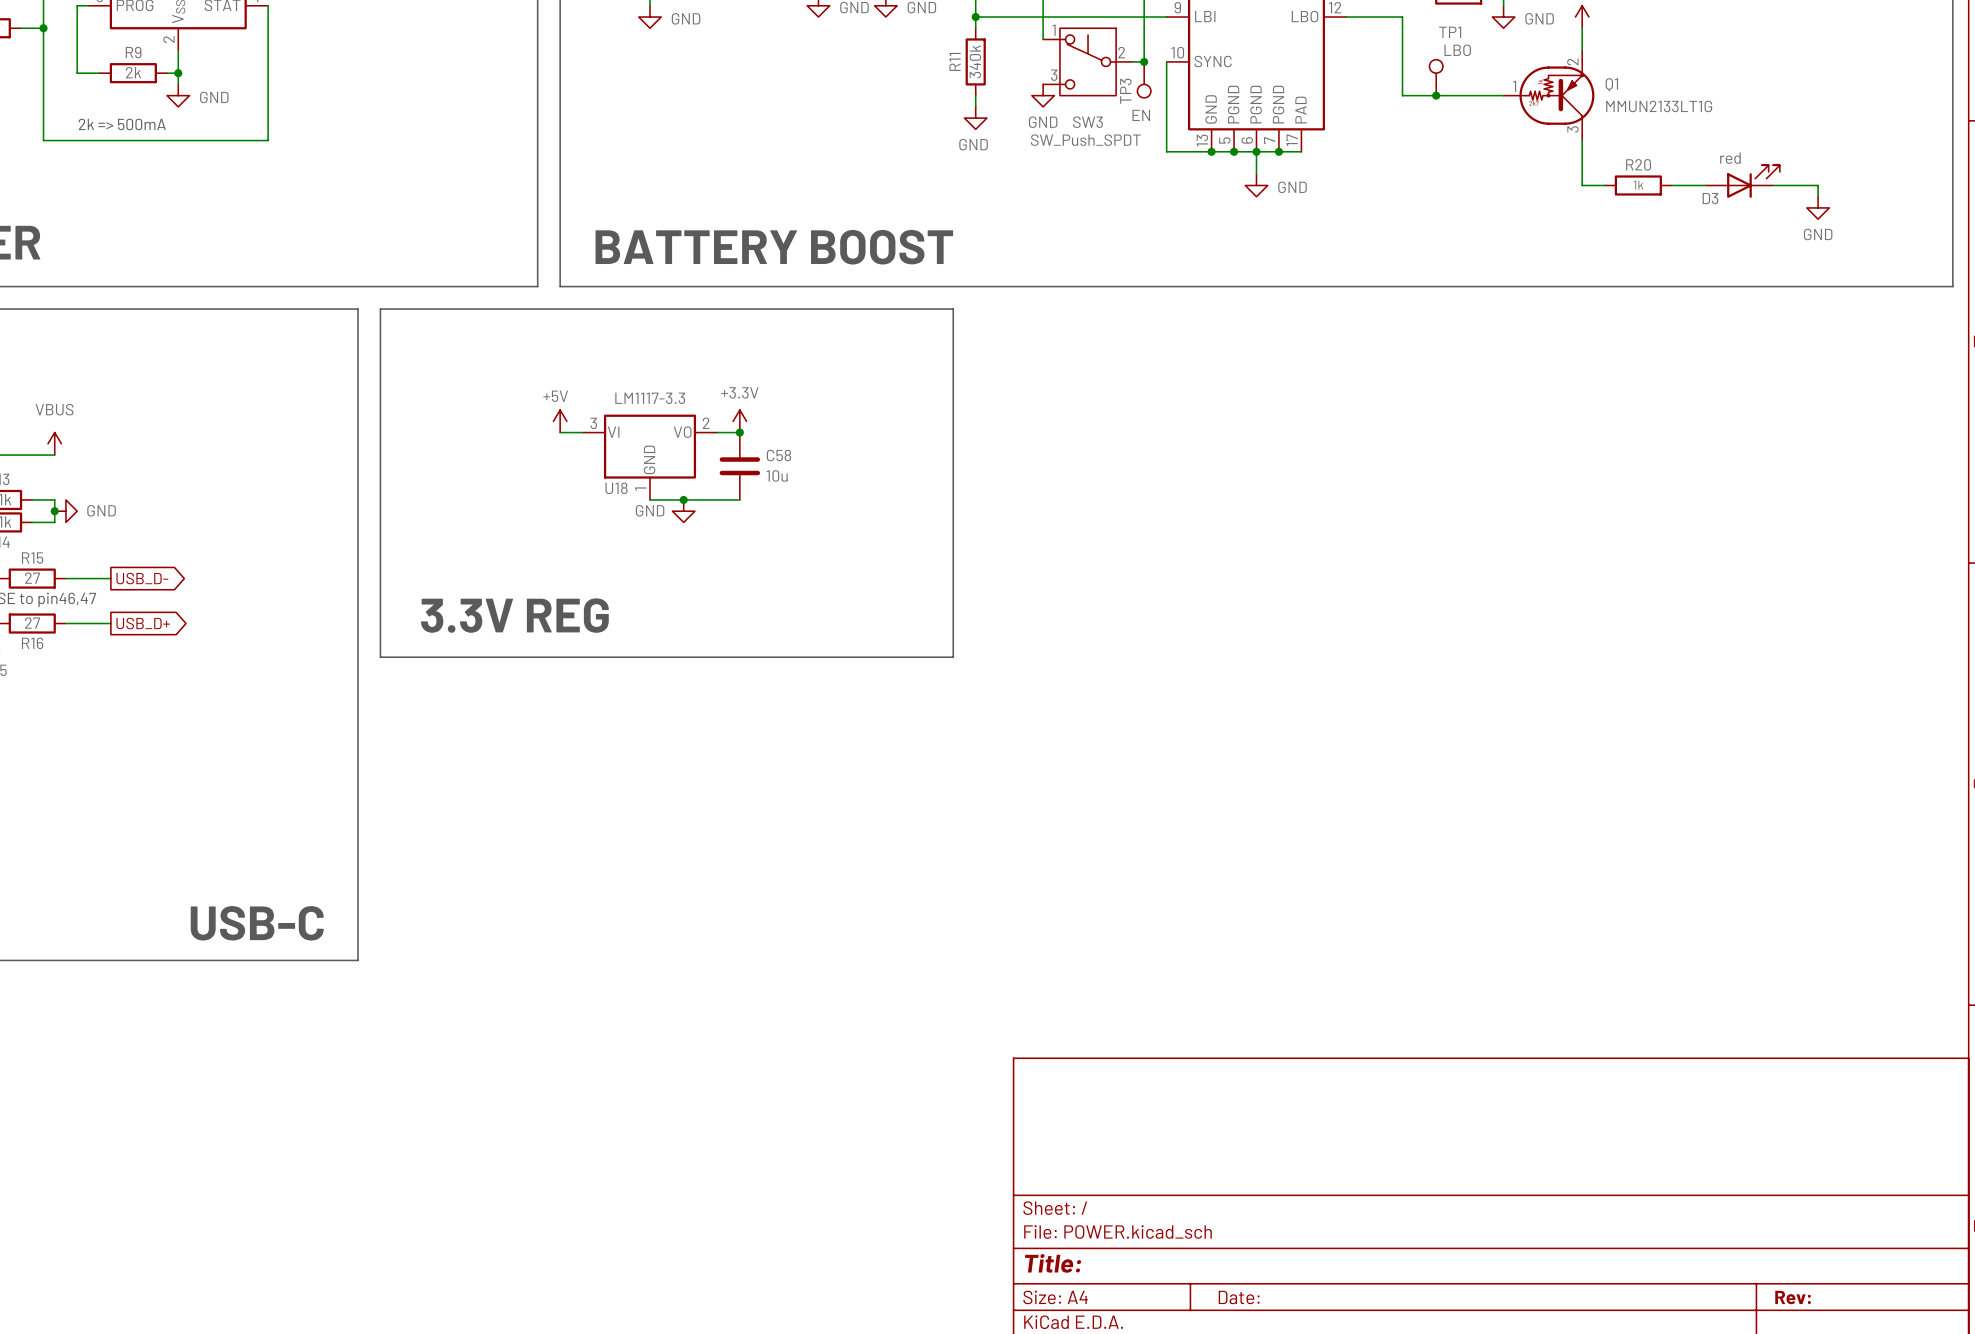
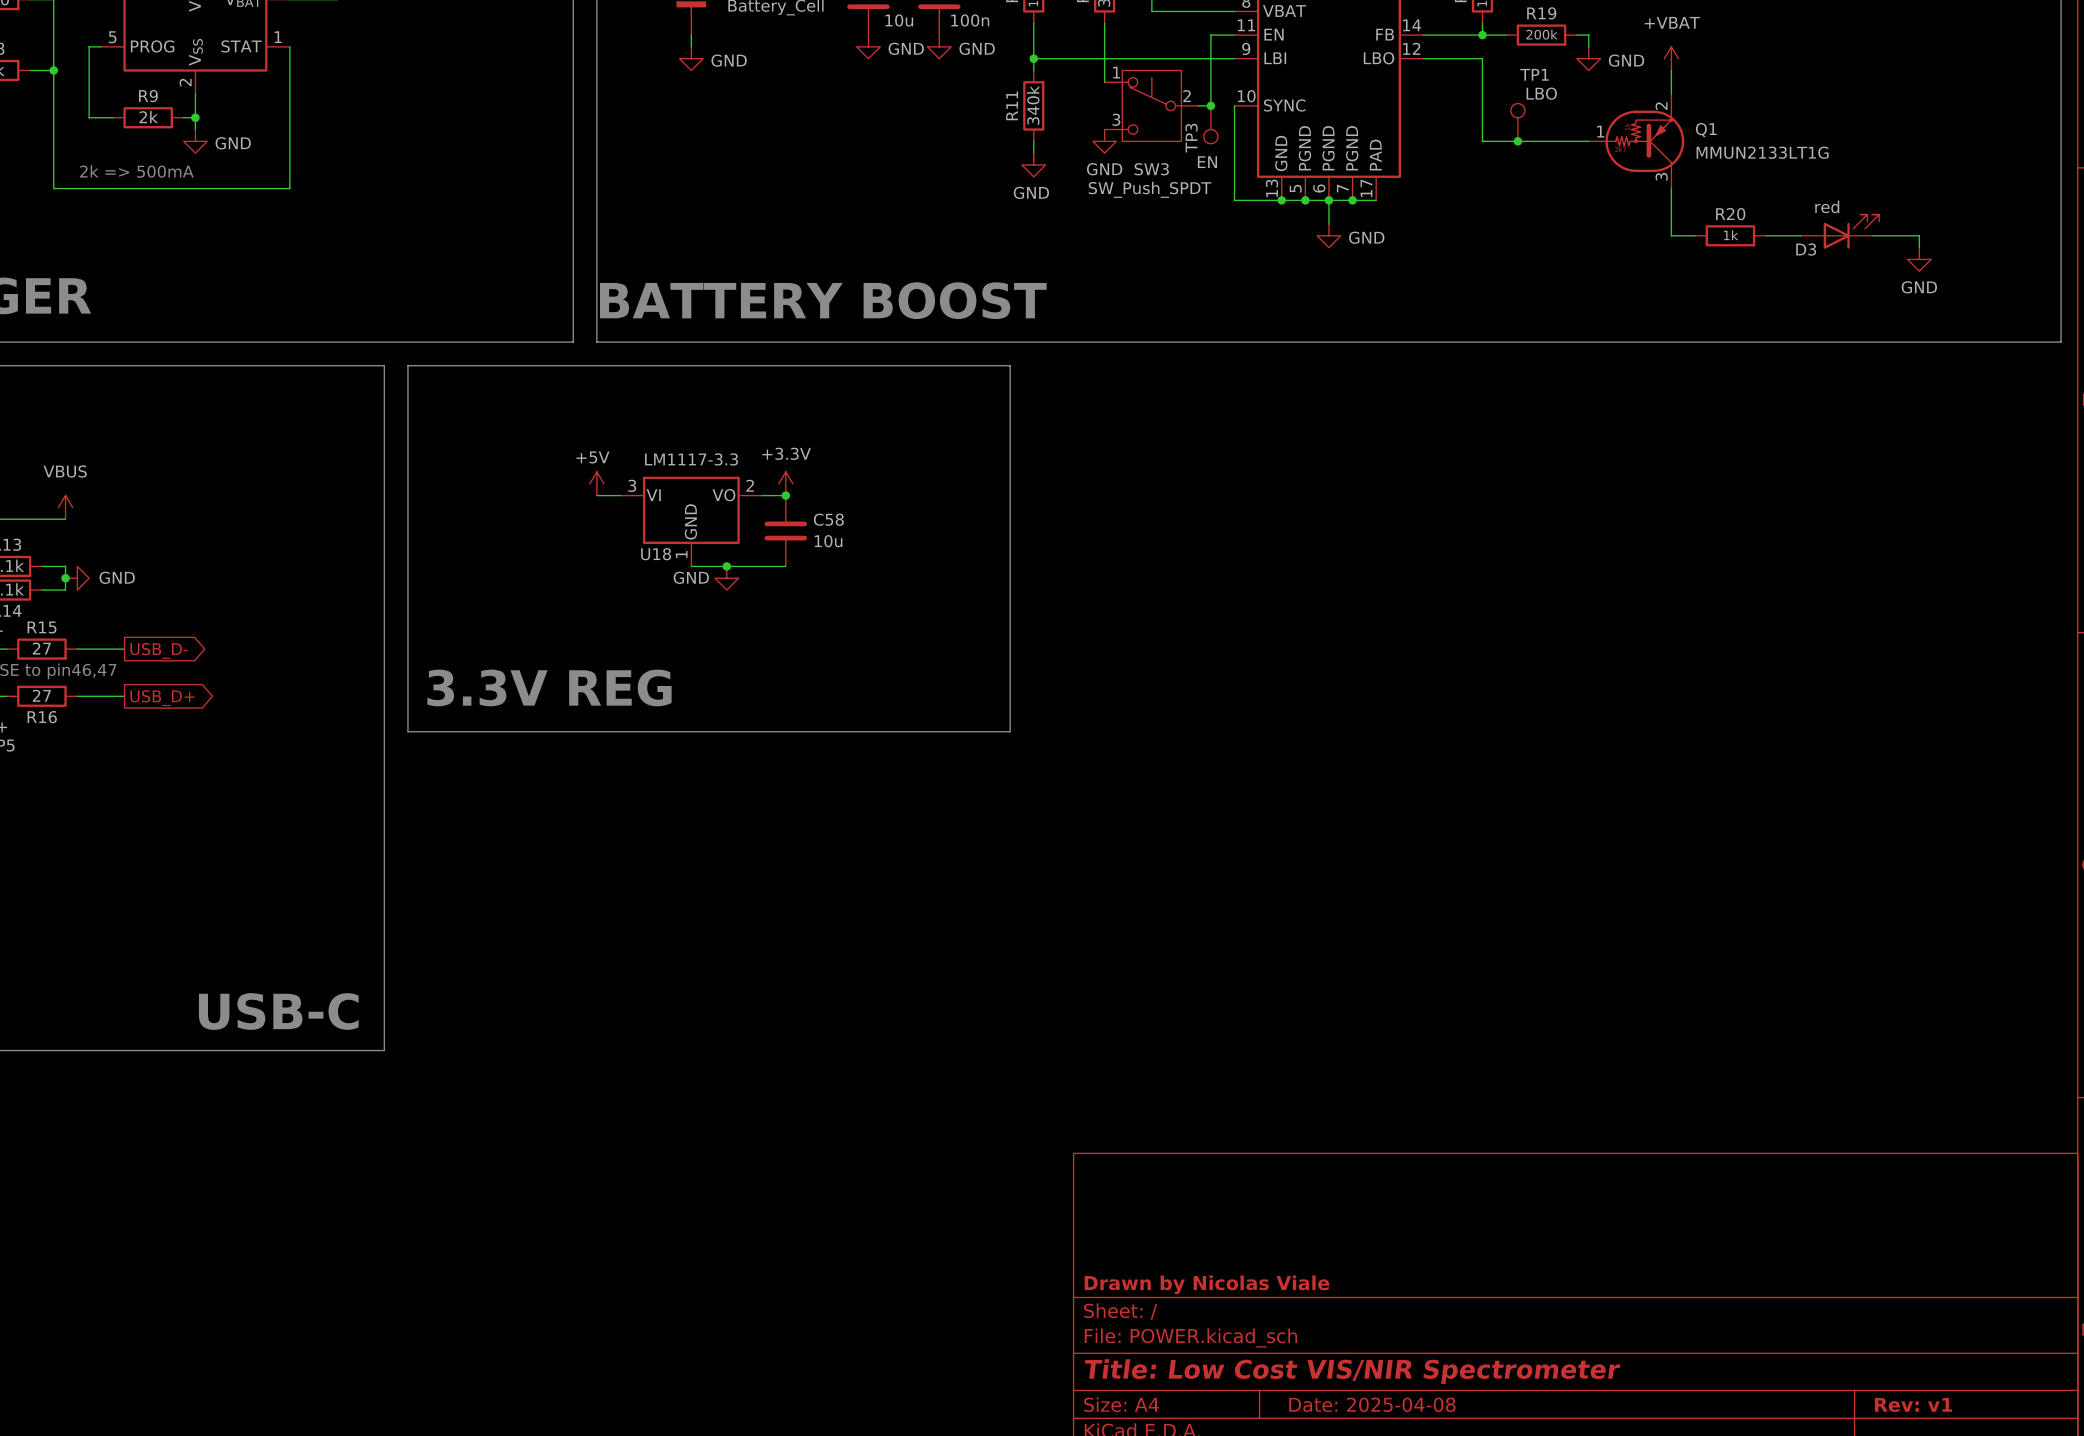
title block: none -> Drawn by Nicolas Viale (1206, 1284)
title block: Title: (1053, 1263) -> Title: Low Cost VIS/NIR Spectrometer (1352, 1371)
title block: Date: (1239, 1297) -> Date: 2025-04-08 (1372, 1404)
title block: Rev: (1793, 1297) -> Rev: v1 (1913, 1404)

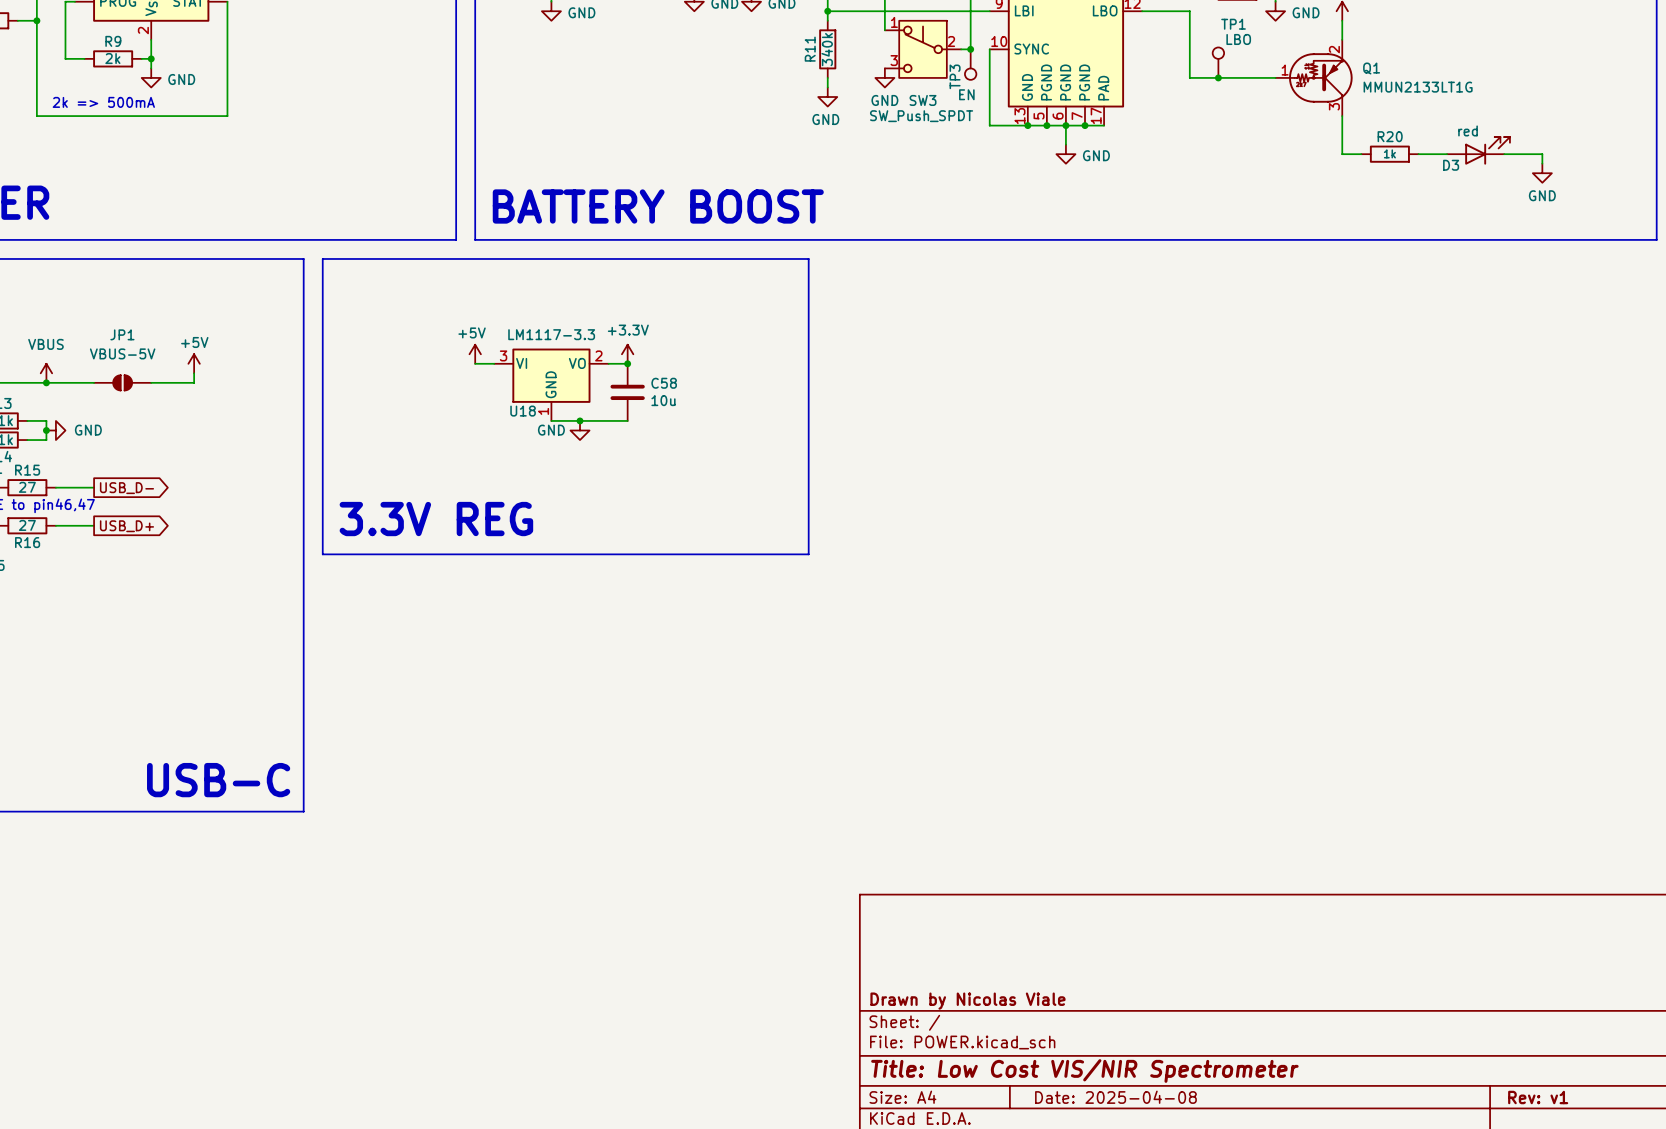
power symbol: none -> +5V (194, 363)
wire: none -> (194, 373) (194, 382) (151, 382)
wire: none -> (46, 382) (94, 382)
junction: none -> (46, 382)
JP1: none -> VBUS-5V (122, 382)

